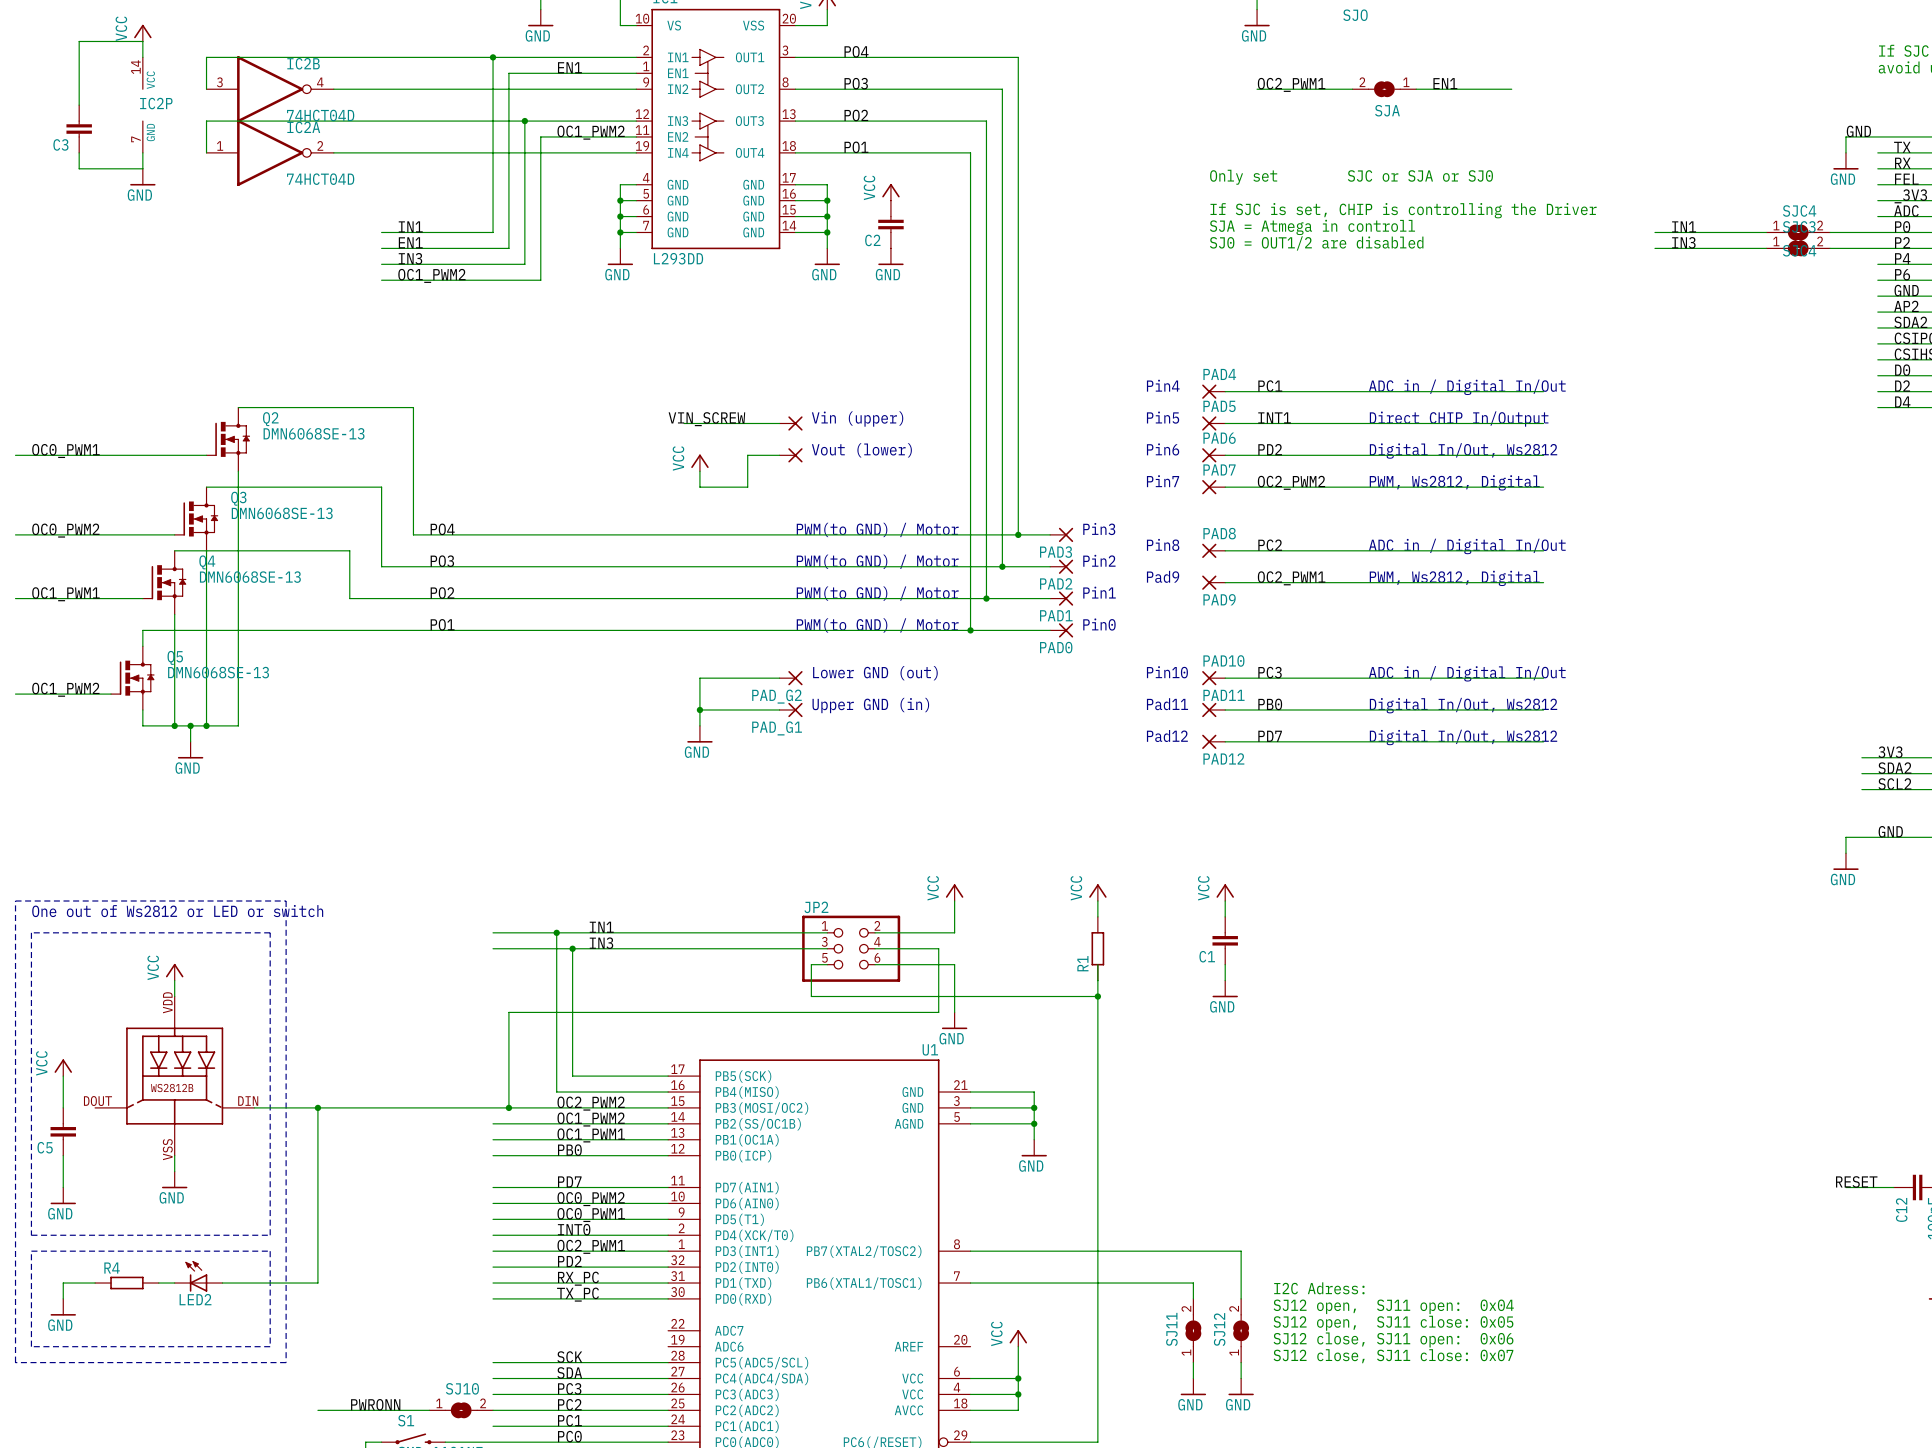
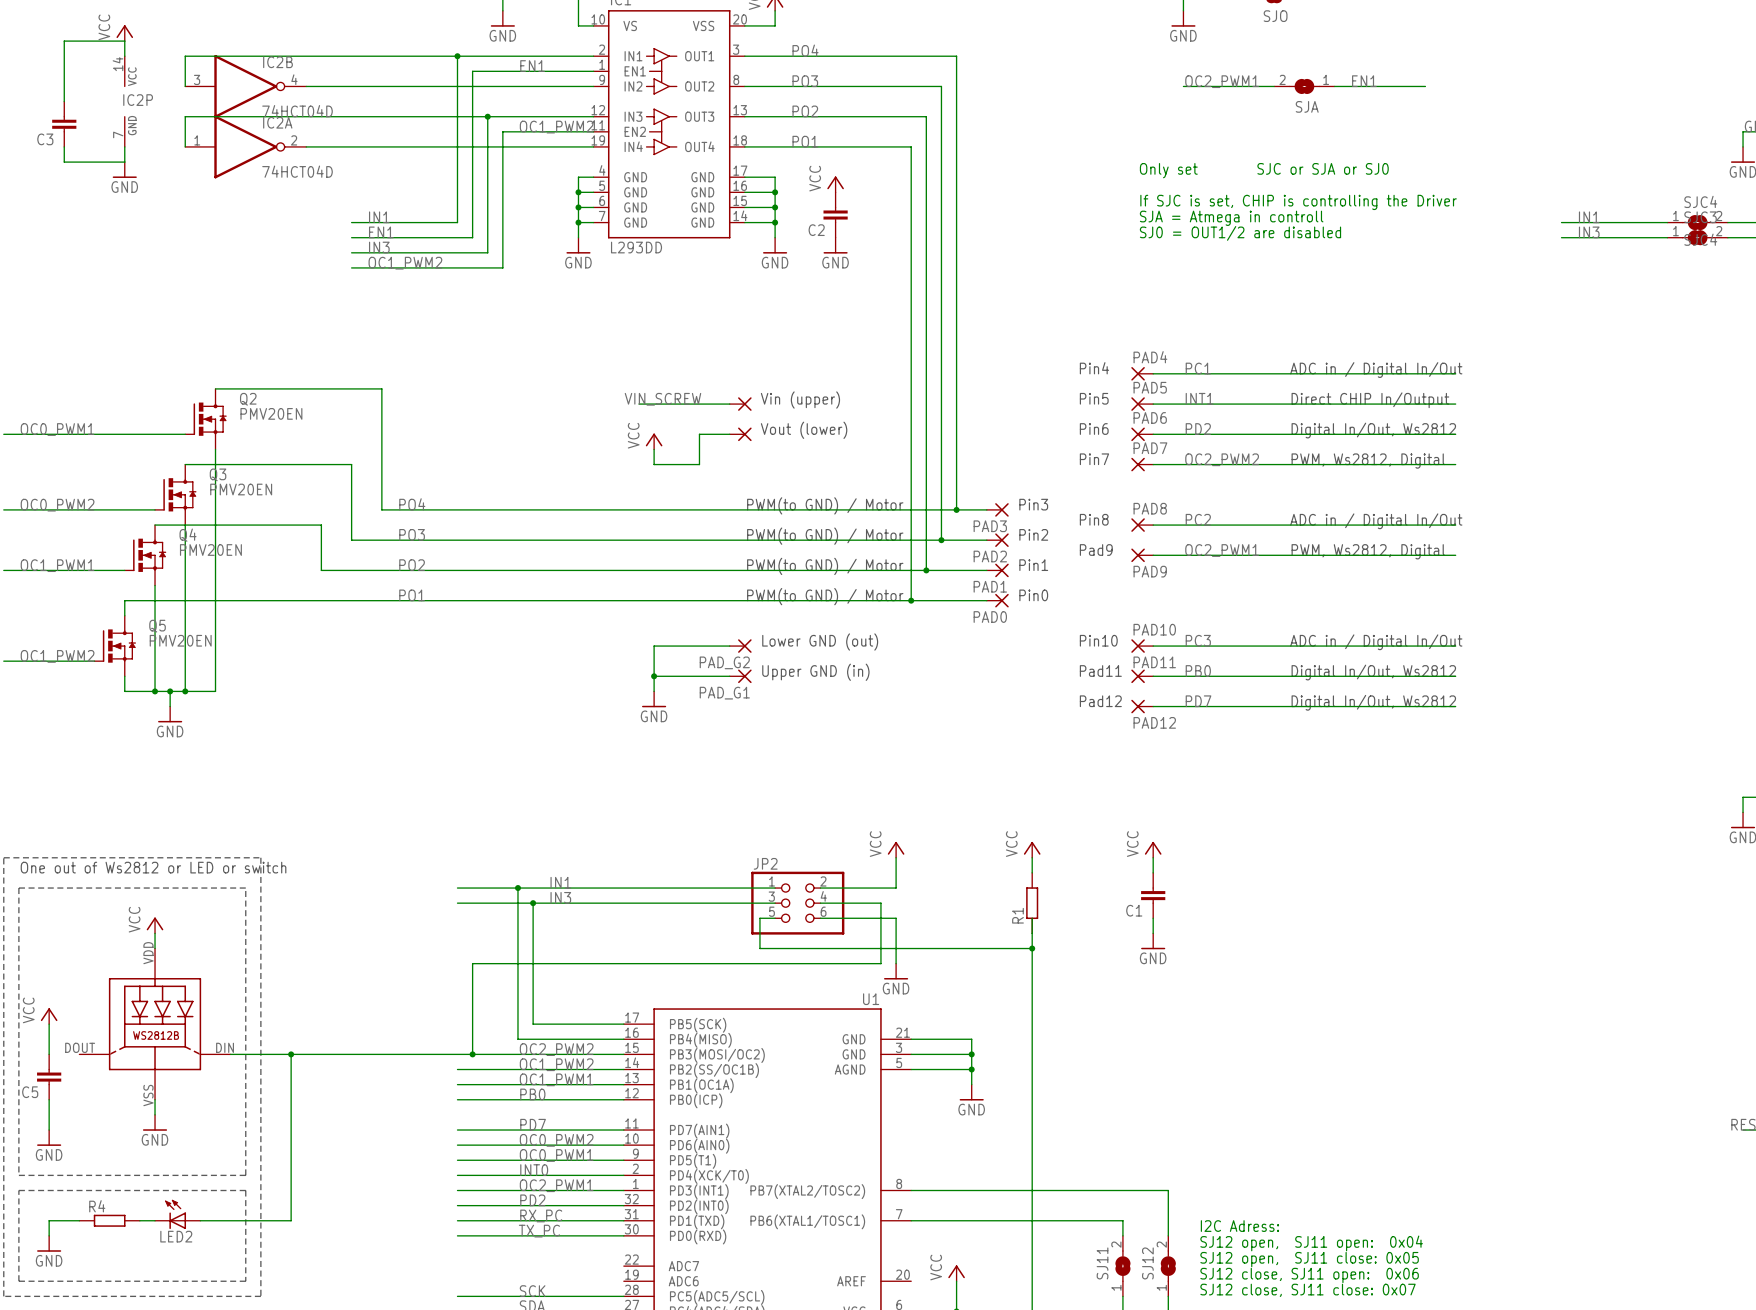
Q2 value: DMN6068SE-13 (314, 433) -> PMV20EN (271, 413)
Q3 value: DMN6068SE-13 (282, 513) -> PMV20EN (241, 489)
Q4 value: DMN6068SE-13 (250, 577) -> PMV20EN (210, 550)
Q5 value: DMN6068SE-13 (218, 672) -> PMV20EN (180, 640)

